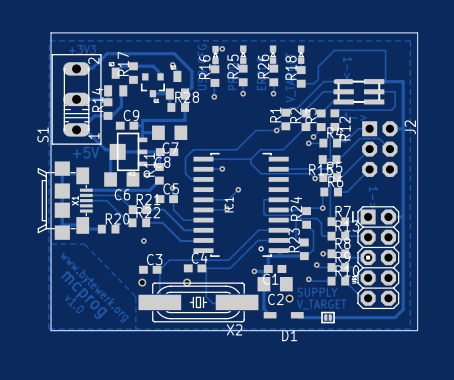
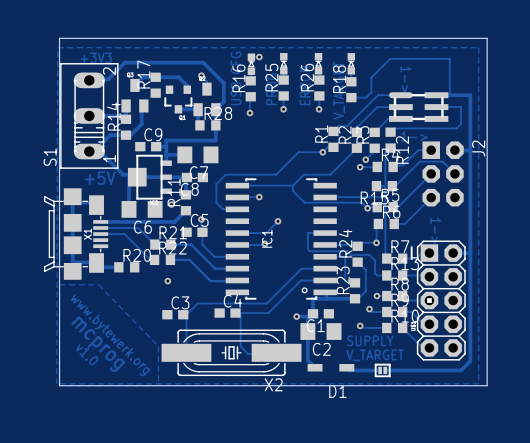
via: (142, 282) -> none
via: (187, 282) -> none
via: (289, 298) -> none

